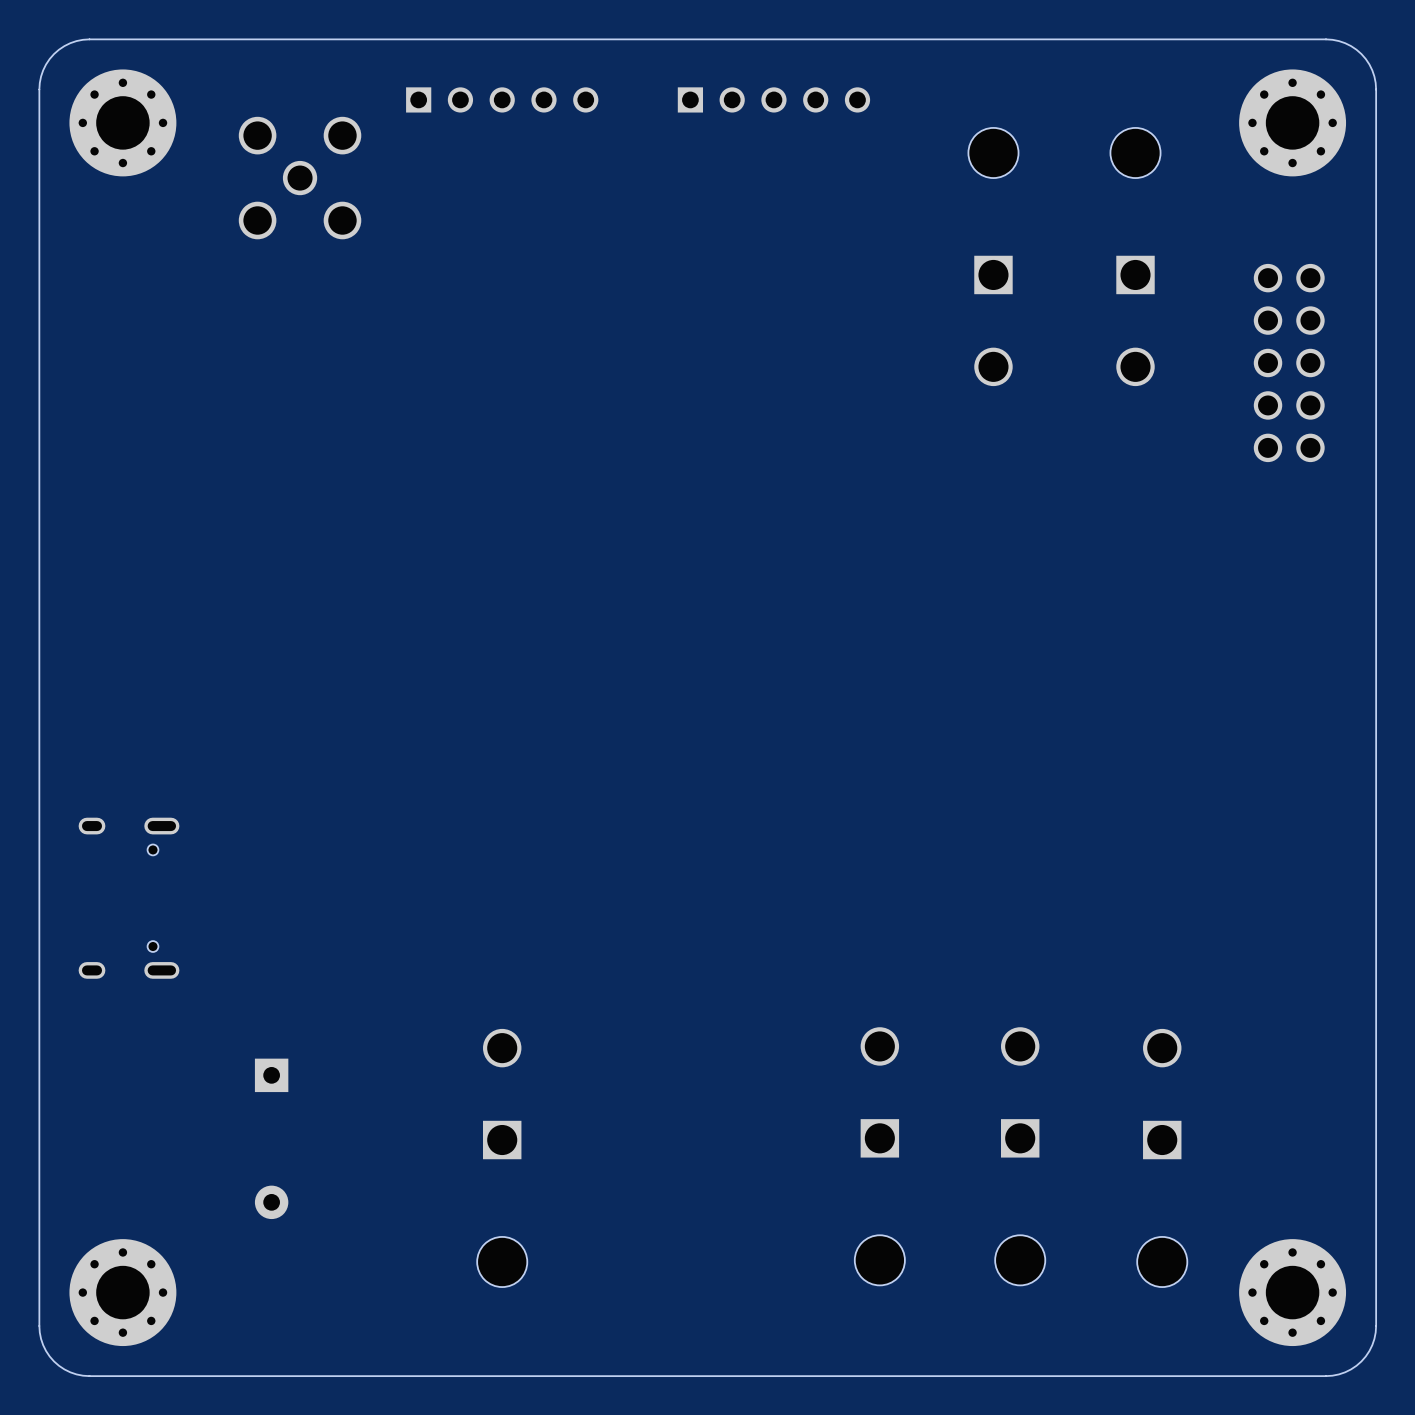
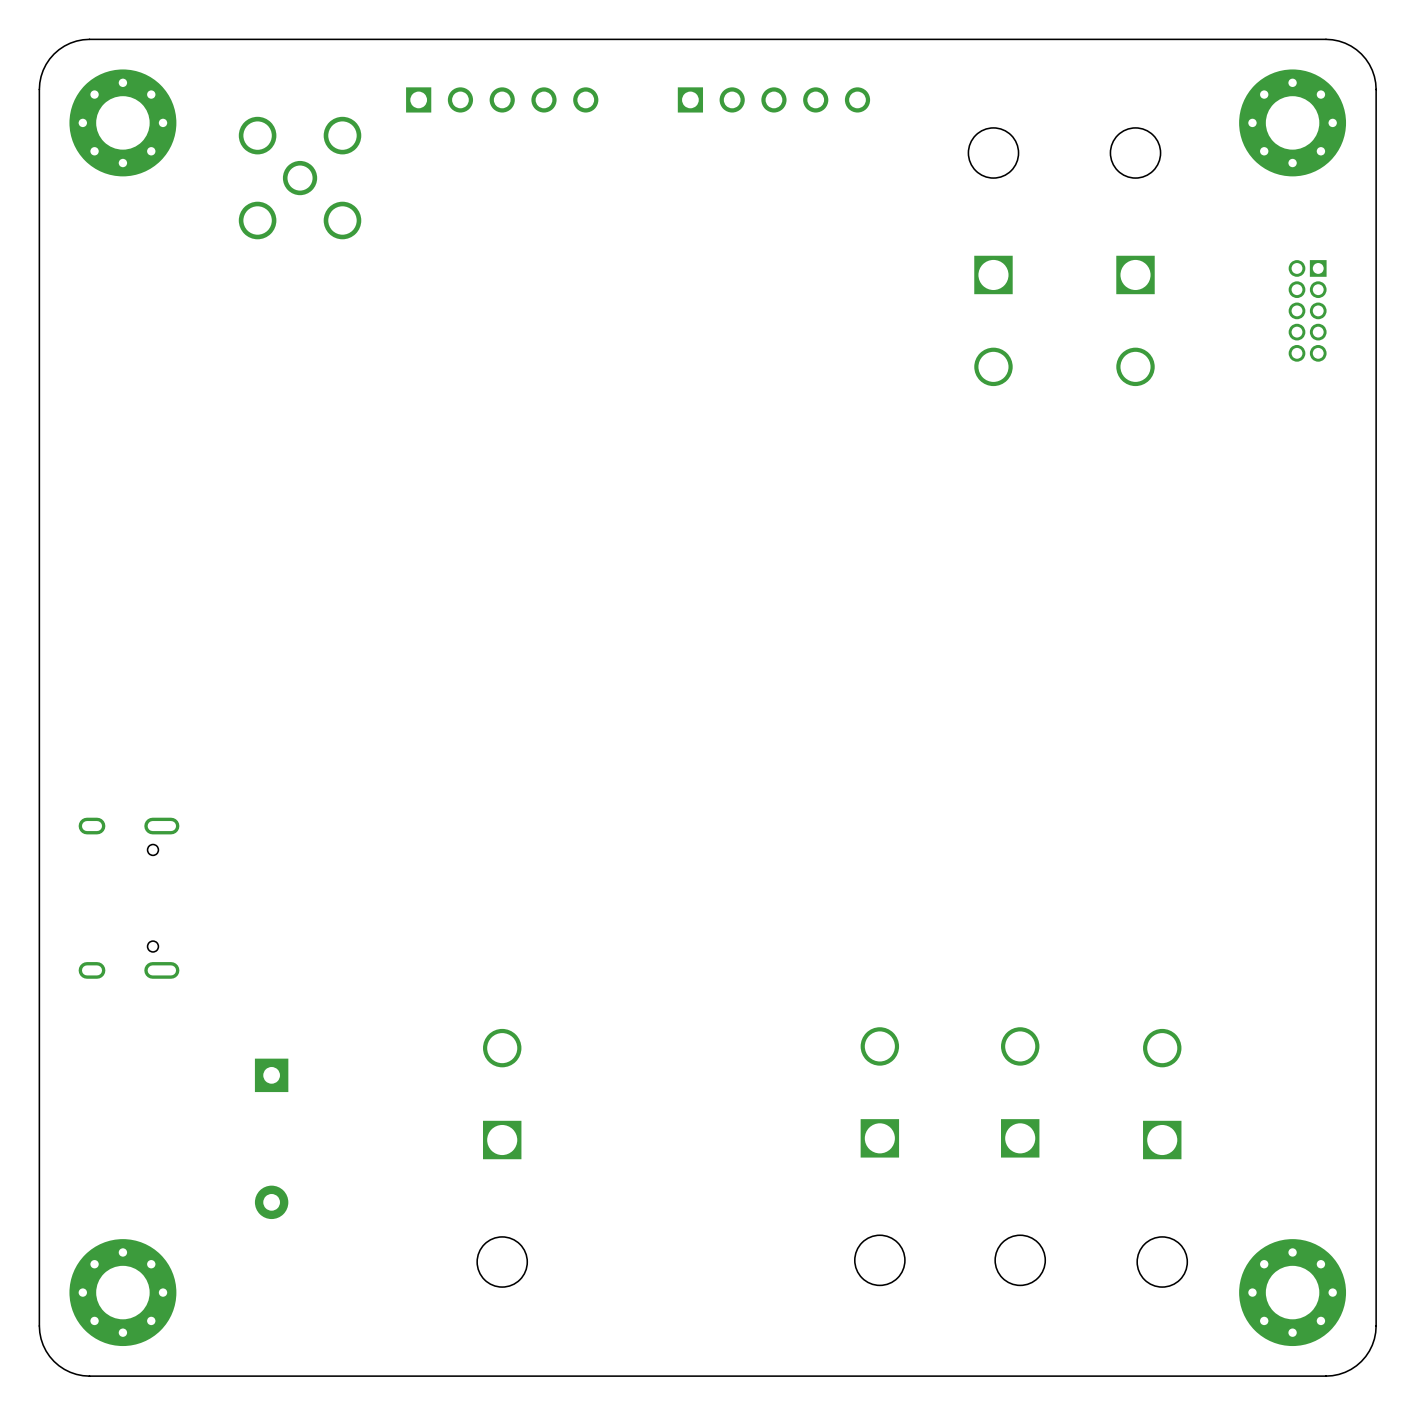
part: none -> (1307, 310)
part: (1289, 363) -> none

